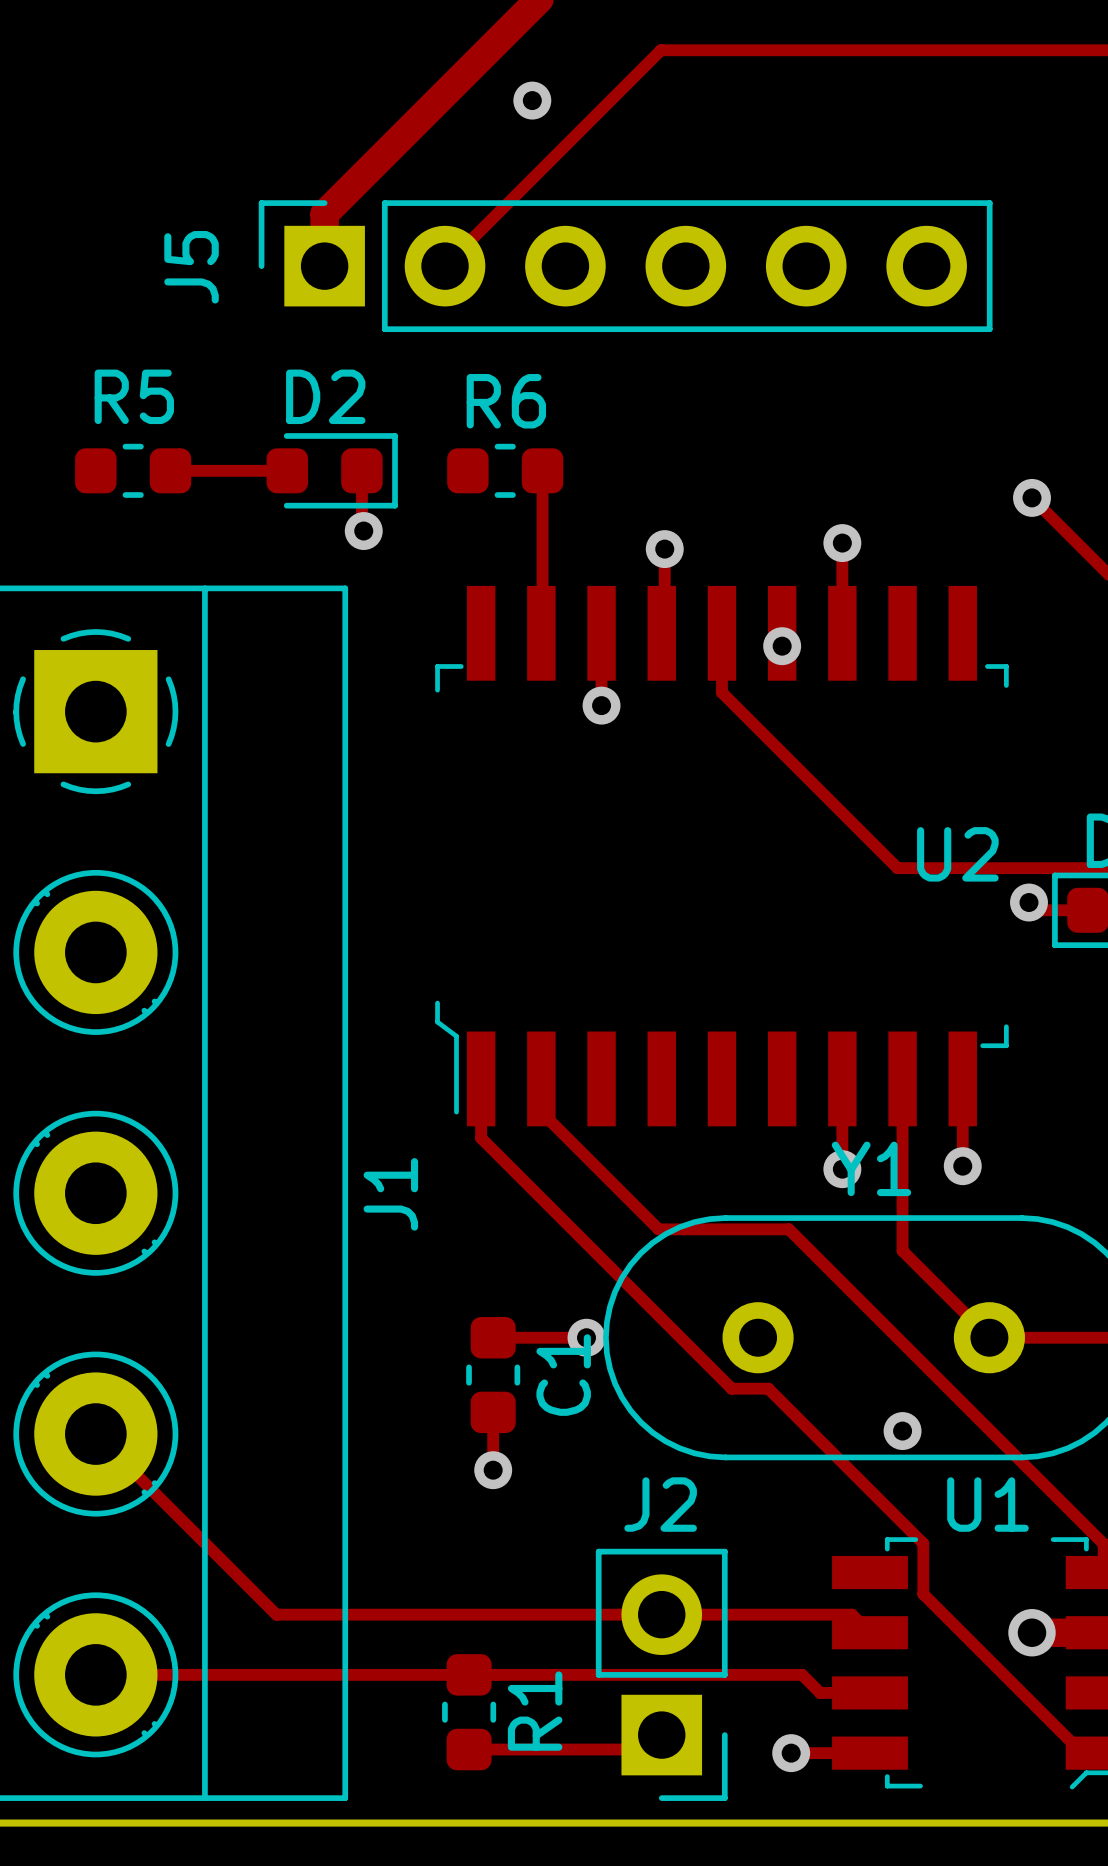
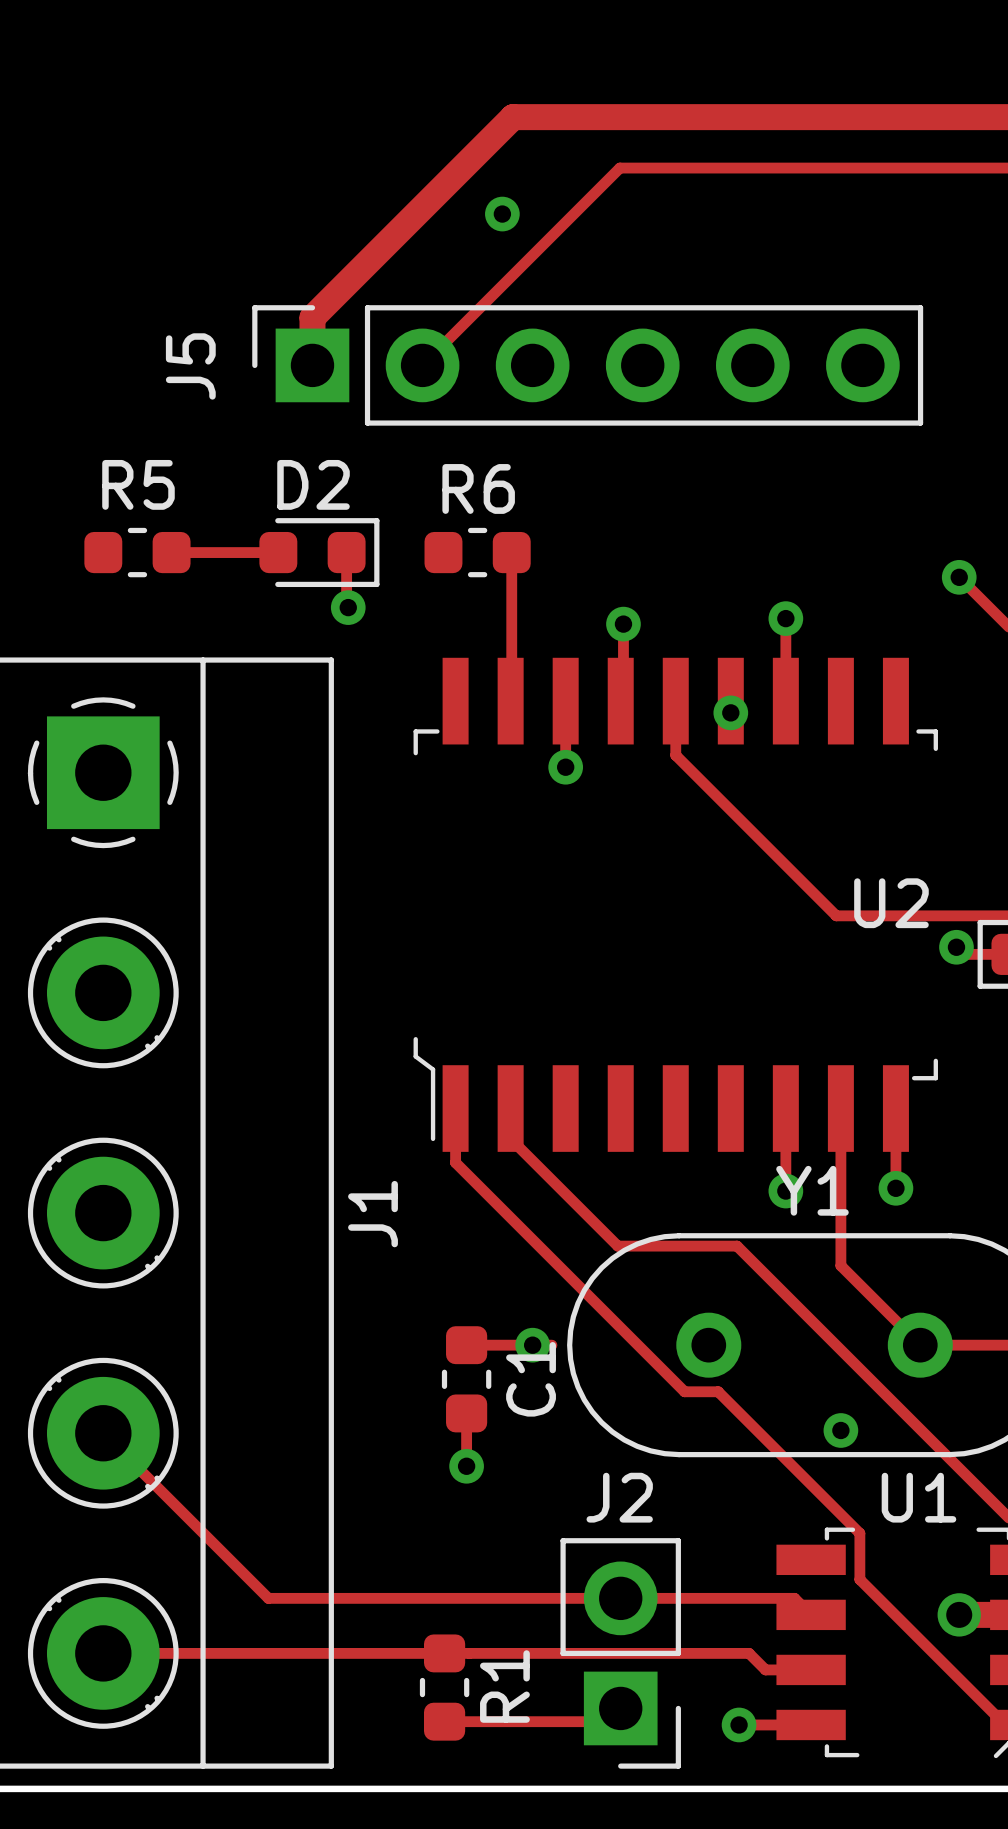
via position: (586, 1337) -> (532, 1345)

